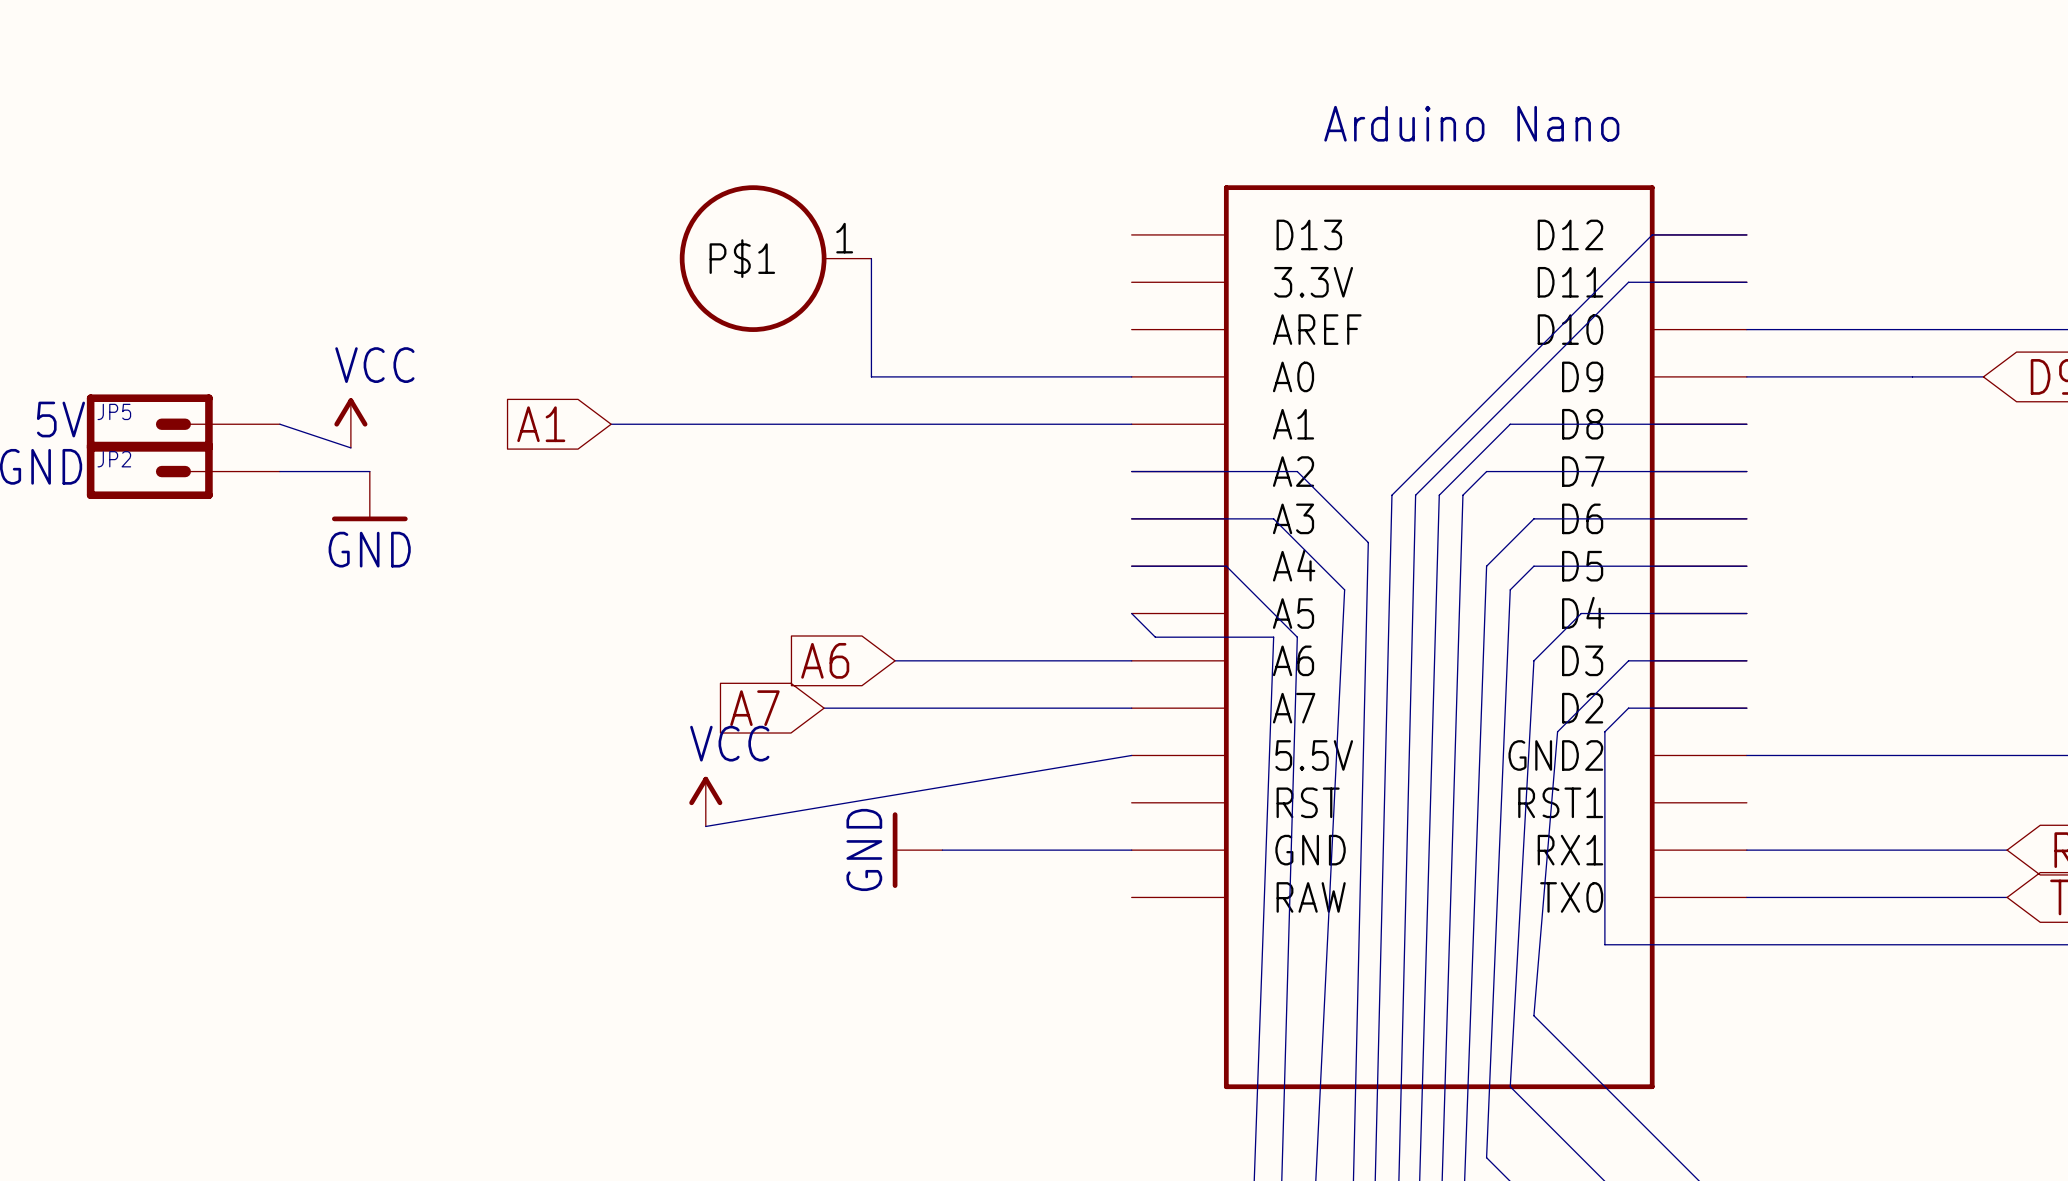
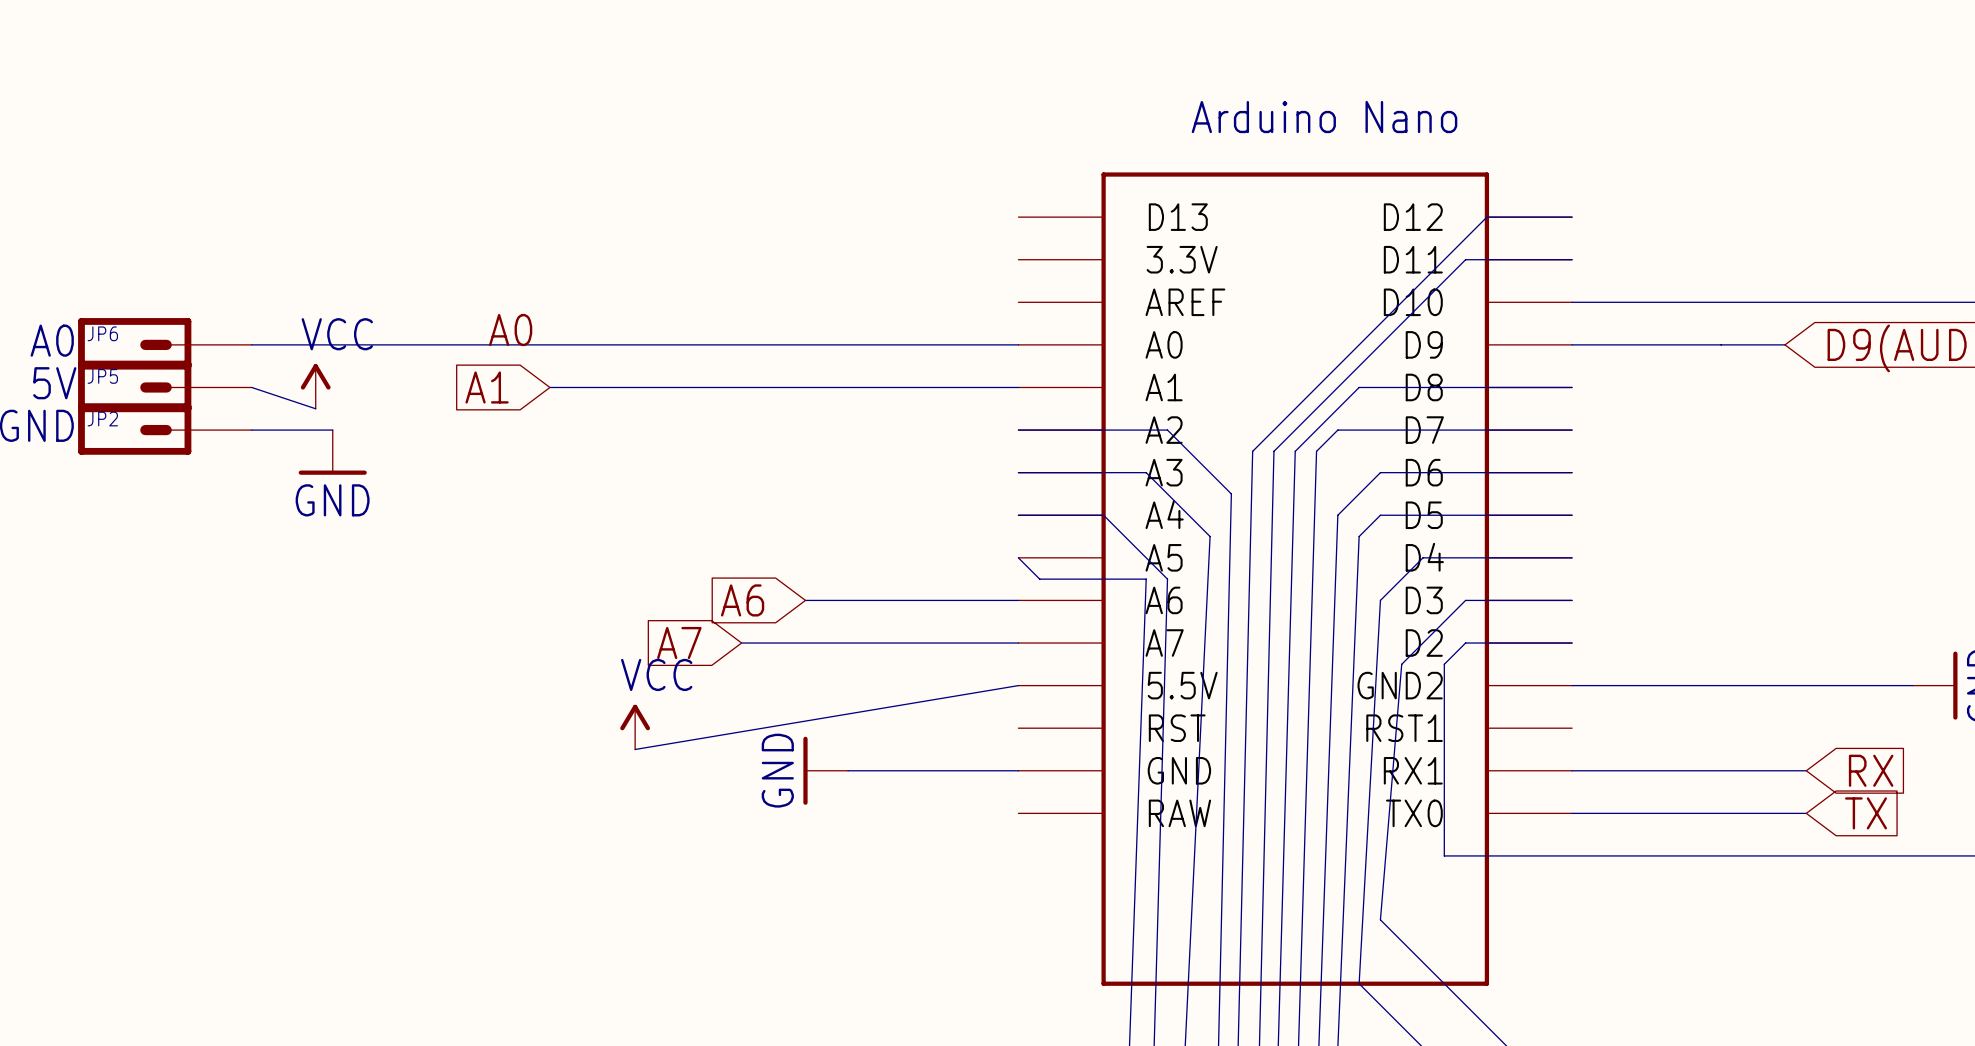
part: (775, 258) -> none
wire: (871, 258) (871, 376) -> (251, 344) (784, 344)
label: none -> A0 (510, 329)
JP6: none -> A0 (164, 343)

